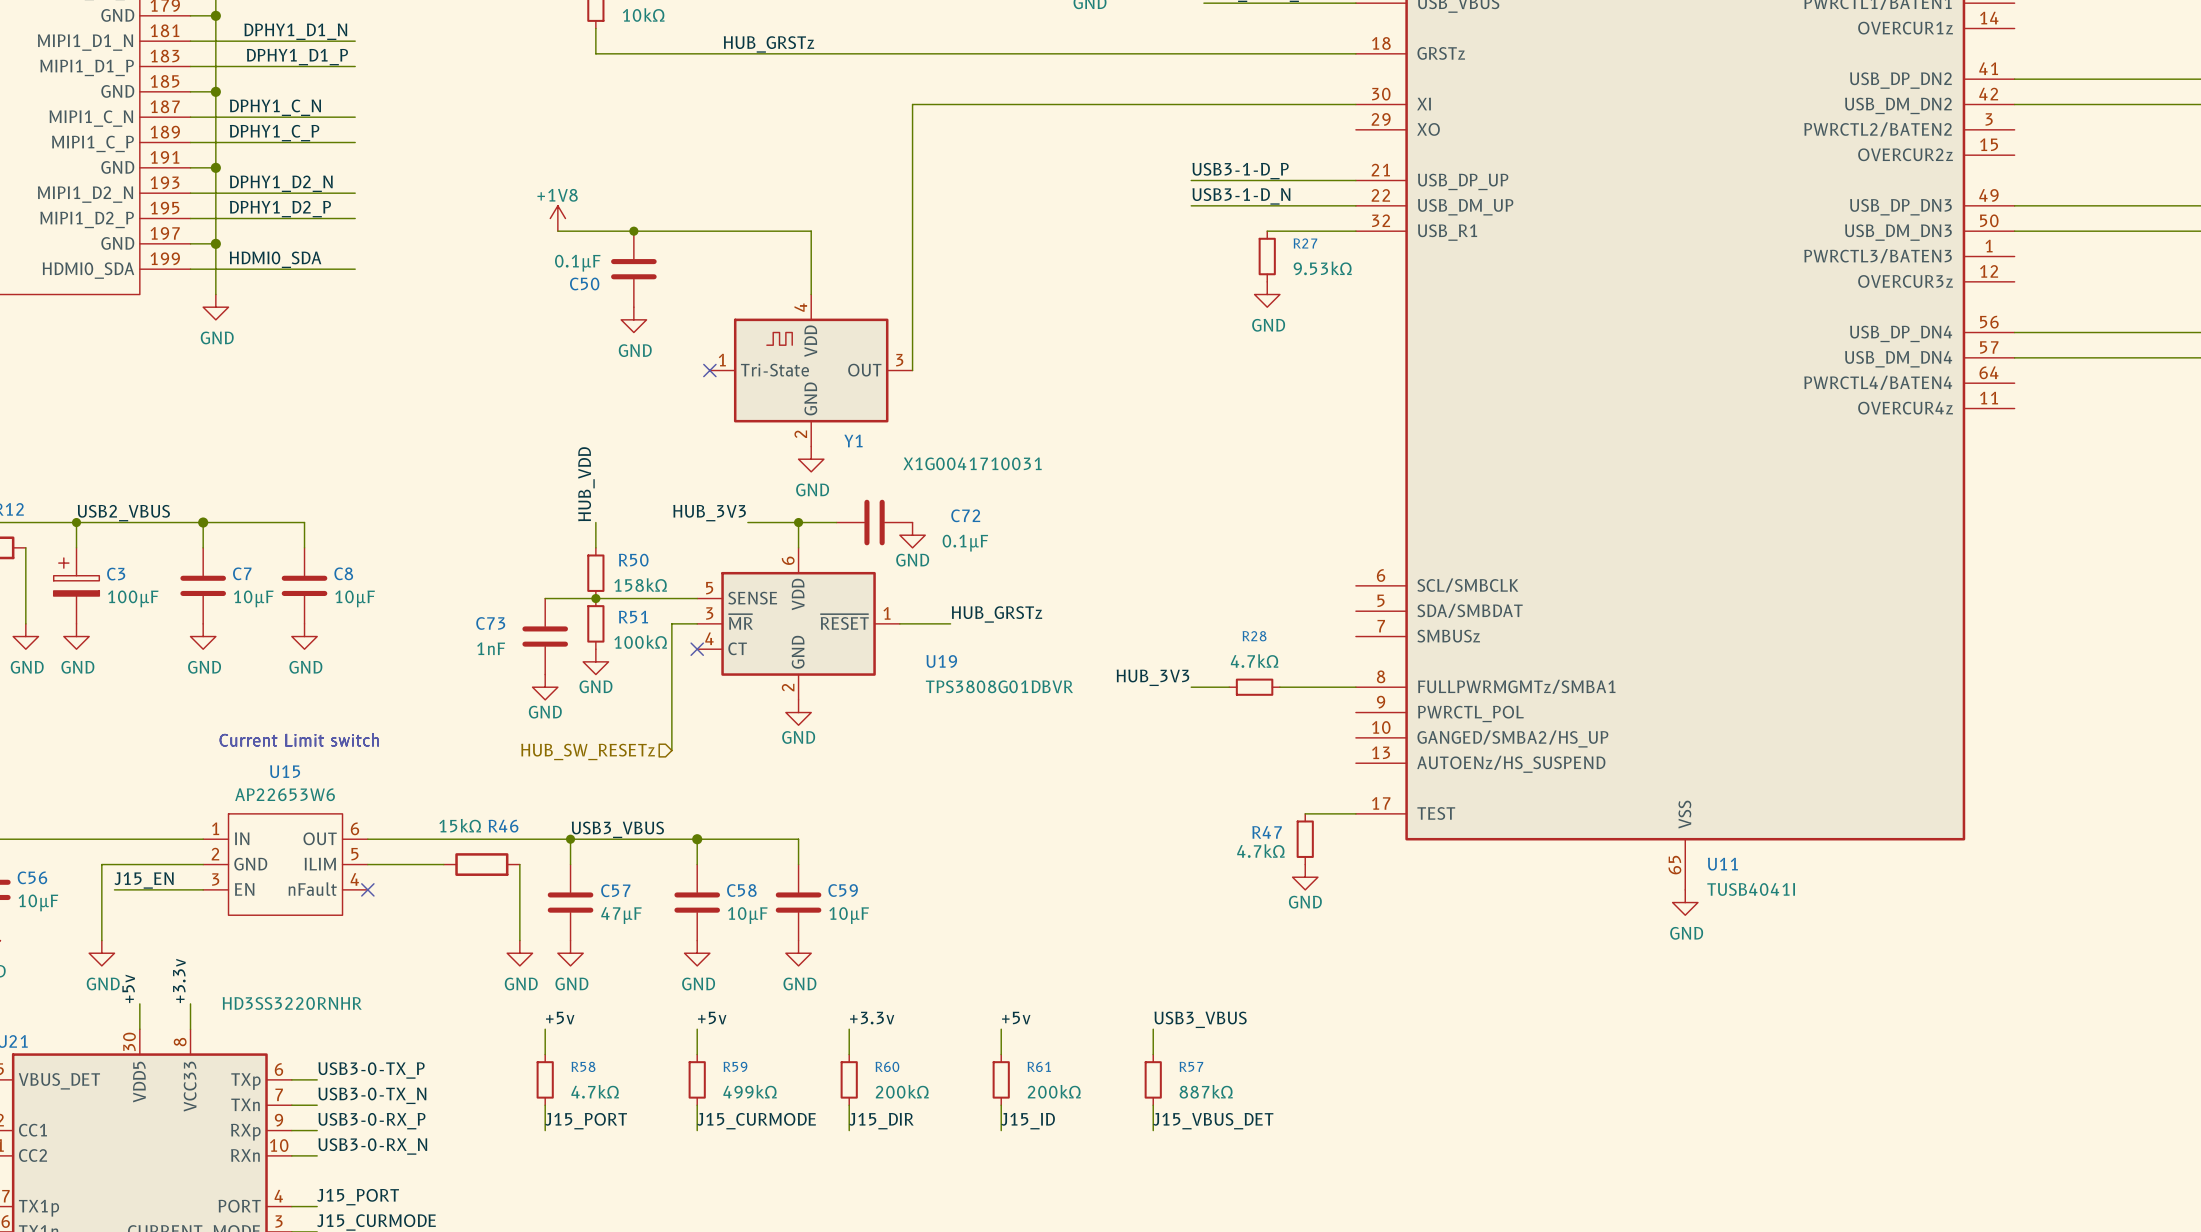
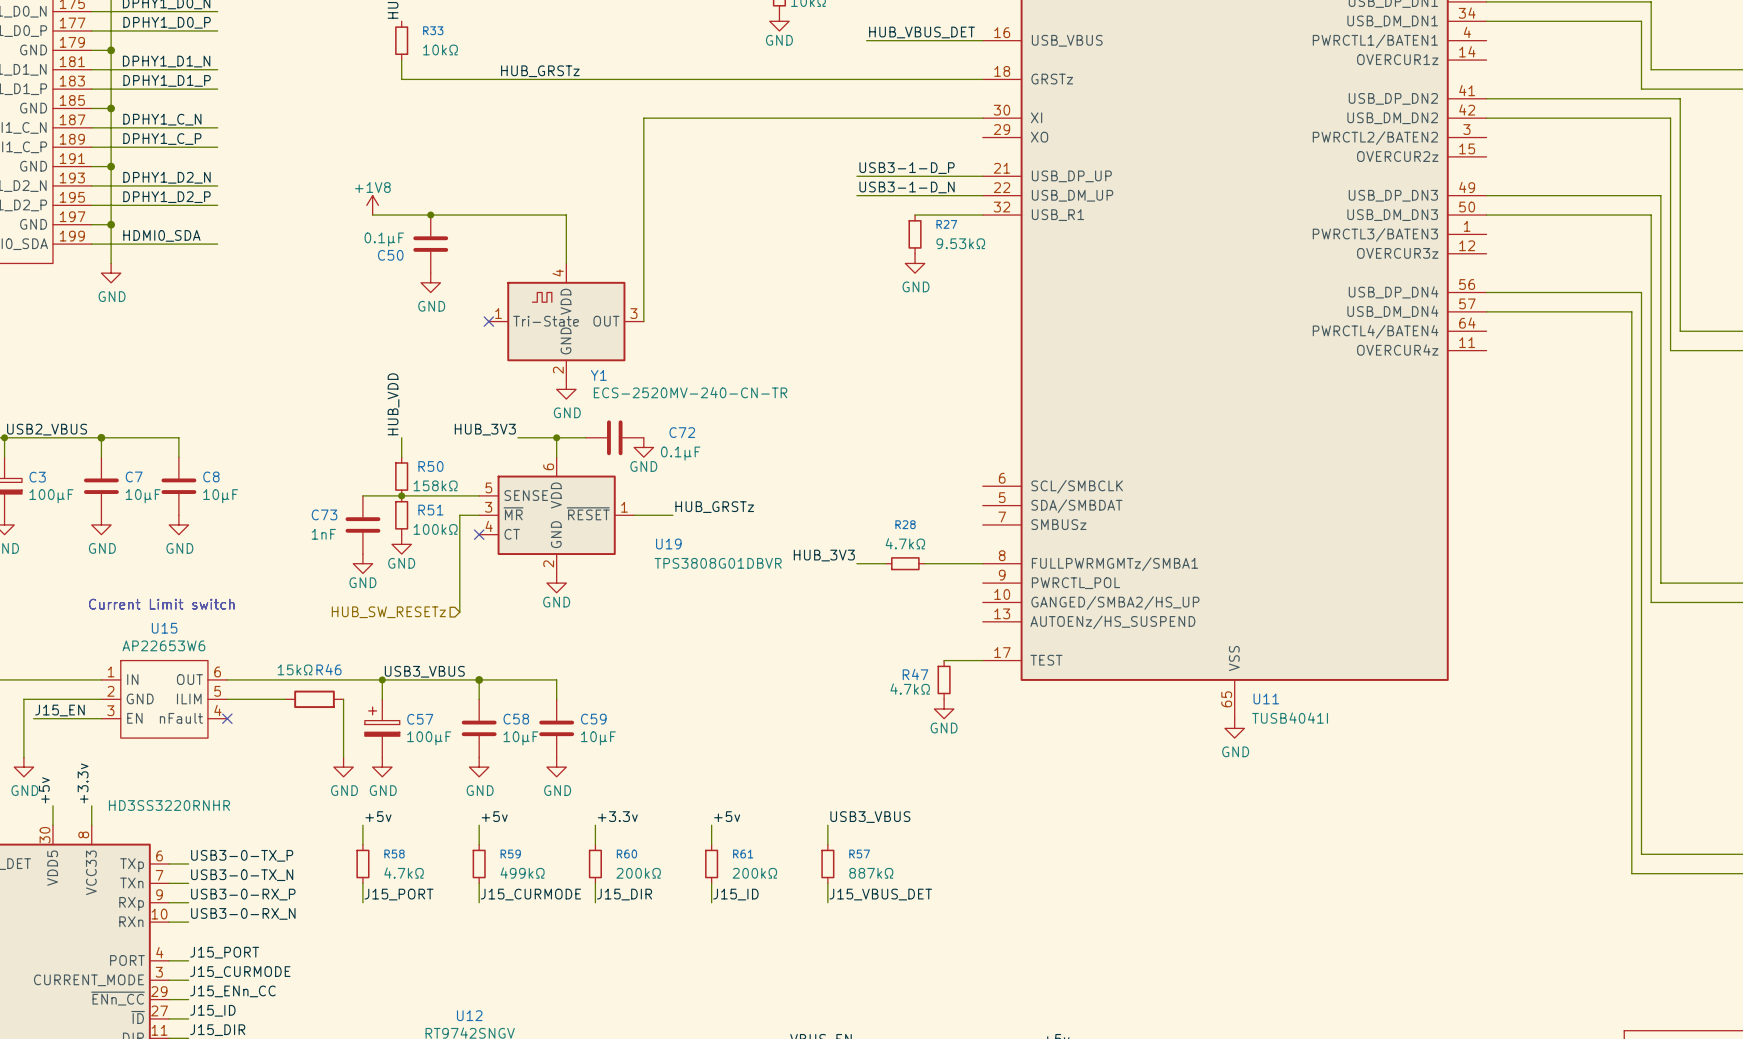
Y1 value: X1G0041710031 (972, 463) -> ECS-2520MV-240-CN-TR (690, 392)
C57 symbol: [547, 864, 594, 941] -> [364, 699, 400, 758]
C57 value: 47µF (621, 915) -> 100µF (429, 738)

